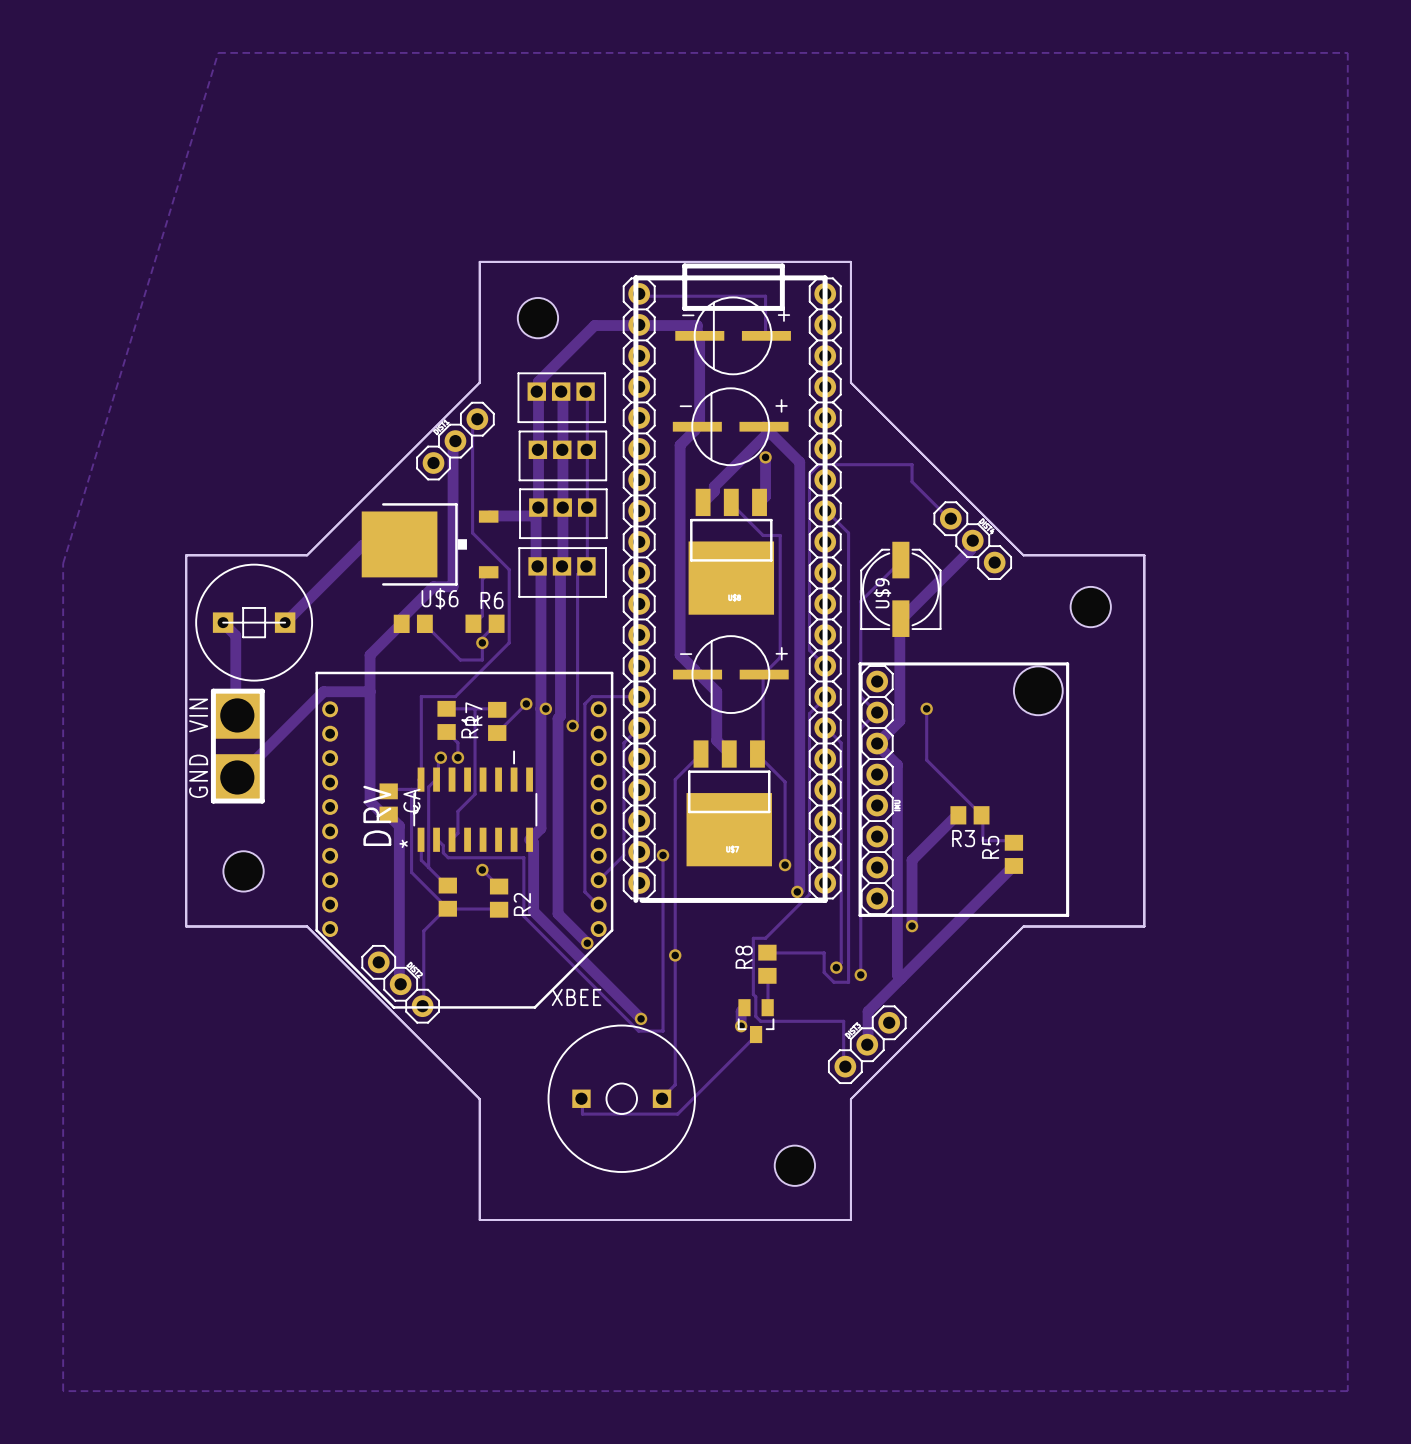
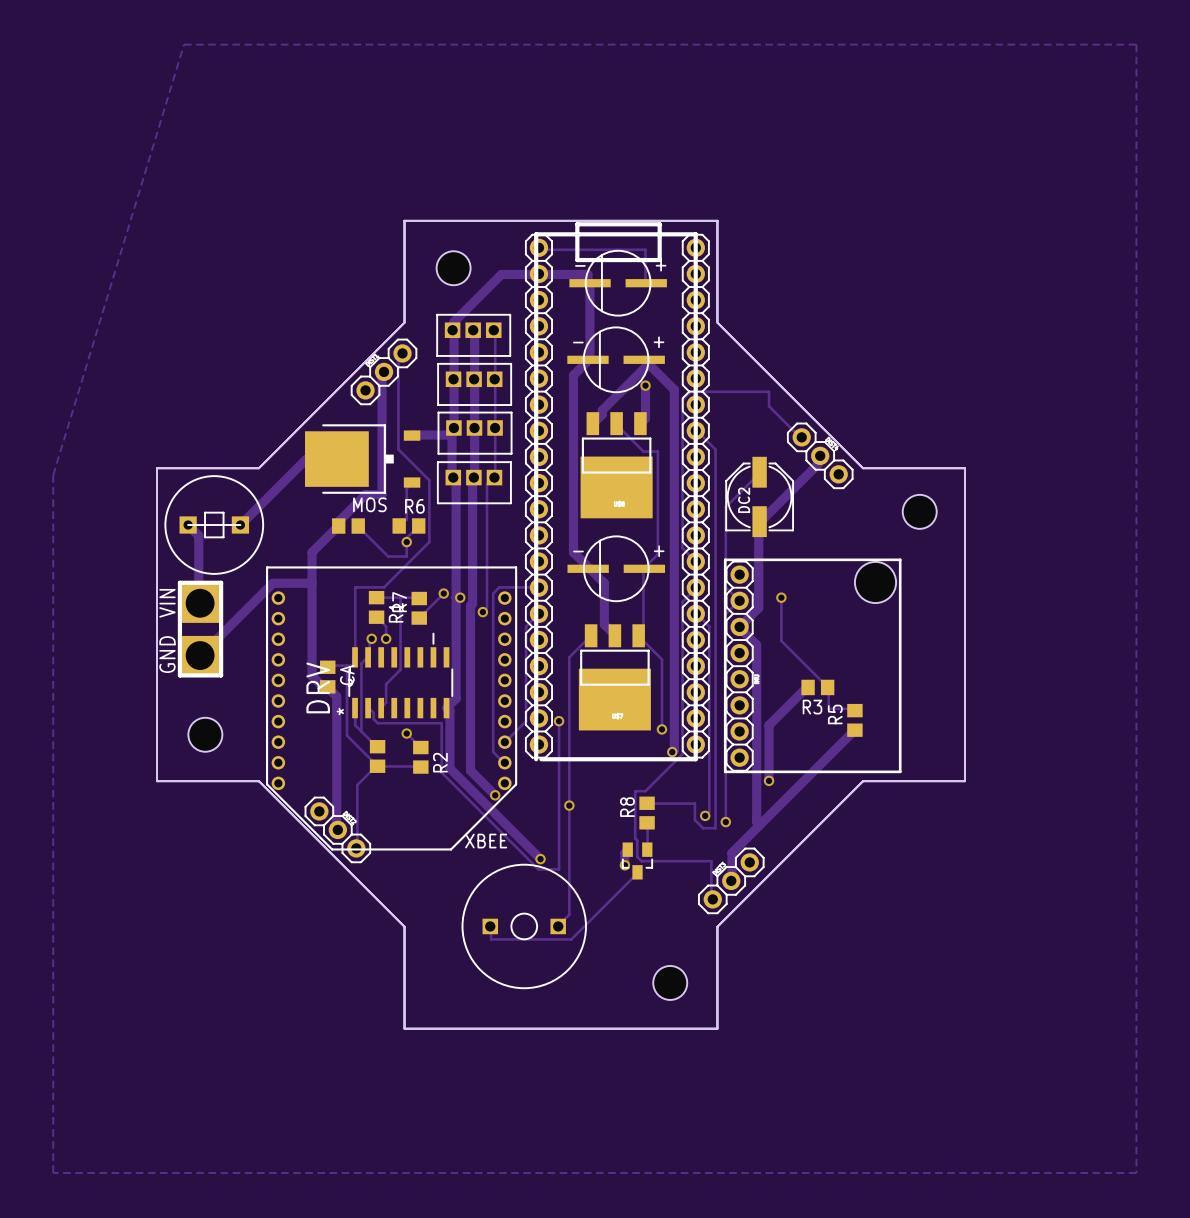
U$9 name: U$9 (882, 593) -> DC2 (744, 500)
U$6 name: U$6 (440, 598) -> MOS (369, 504)

